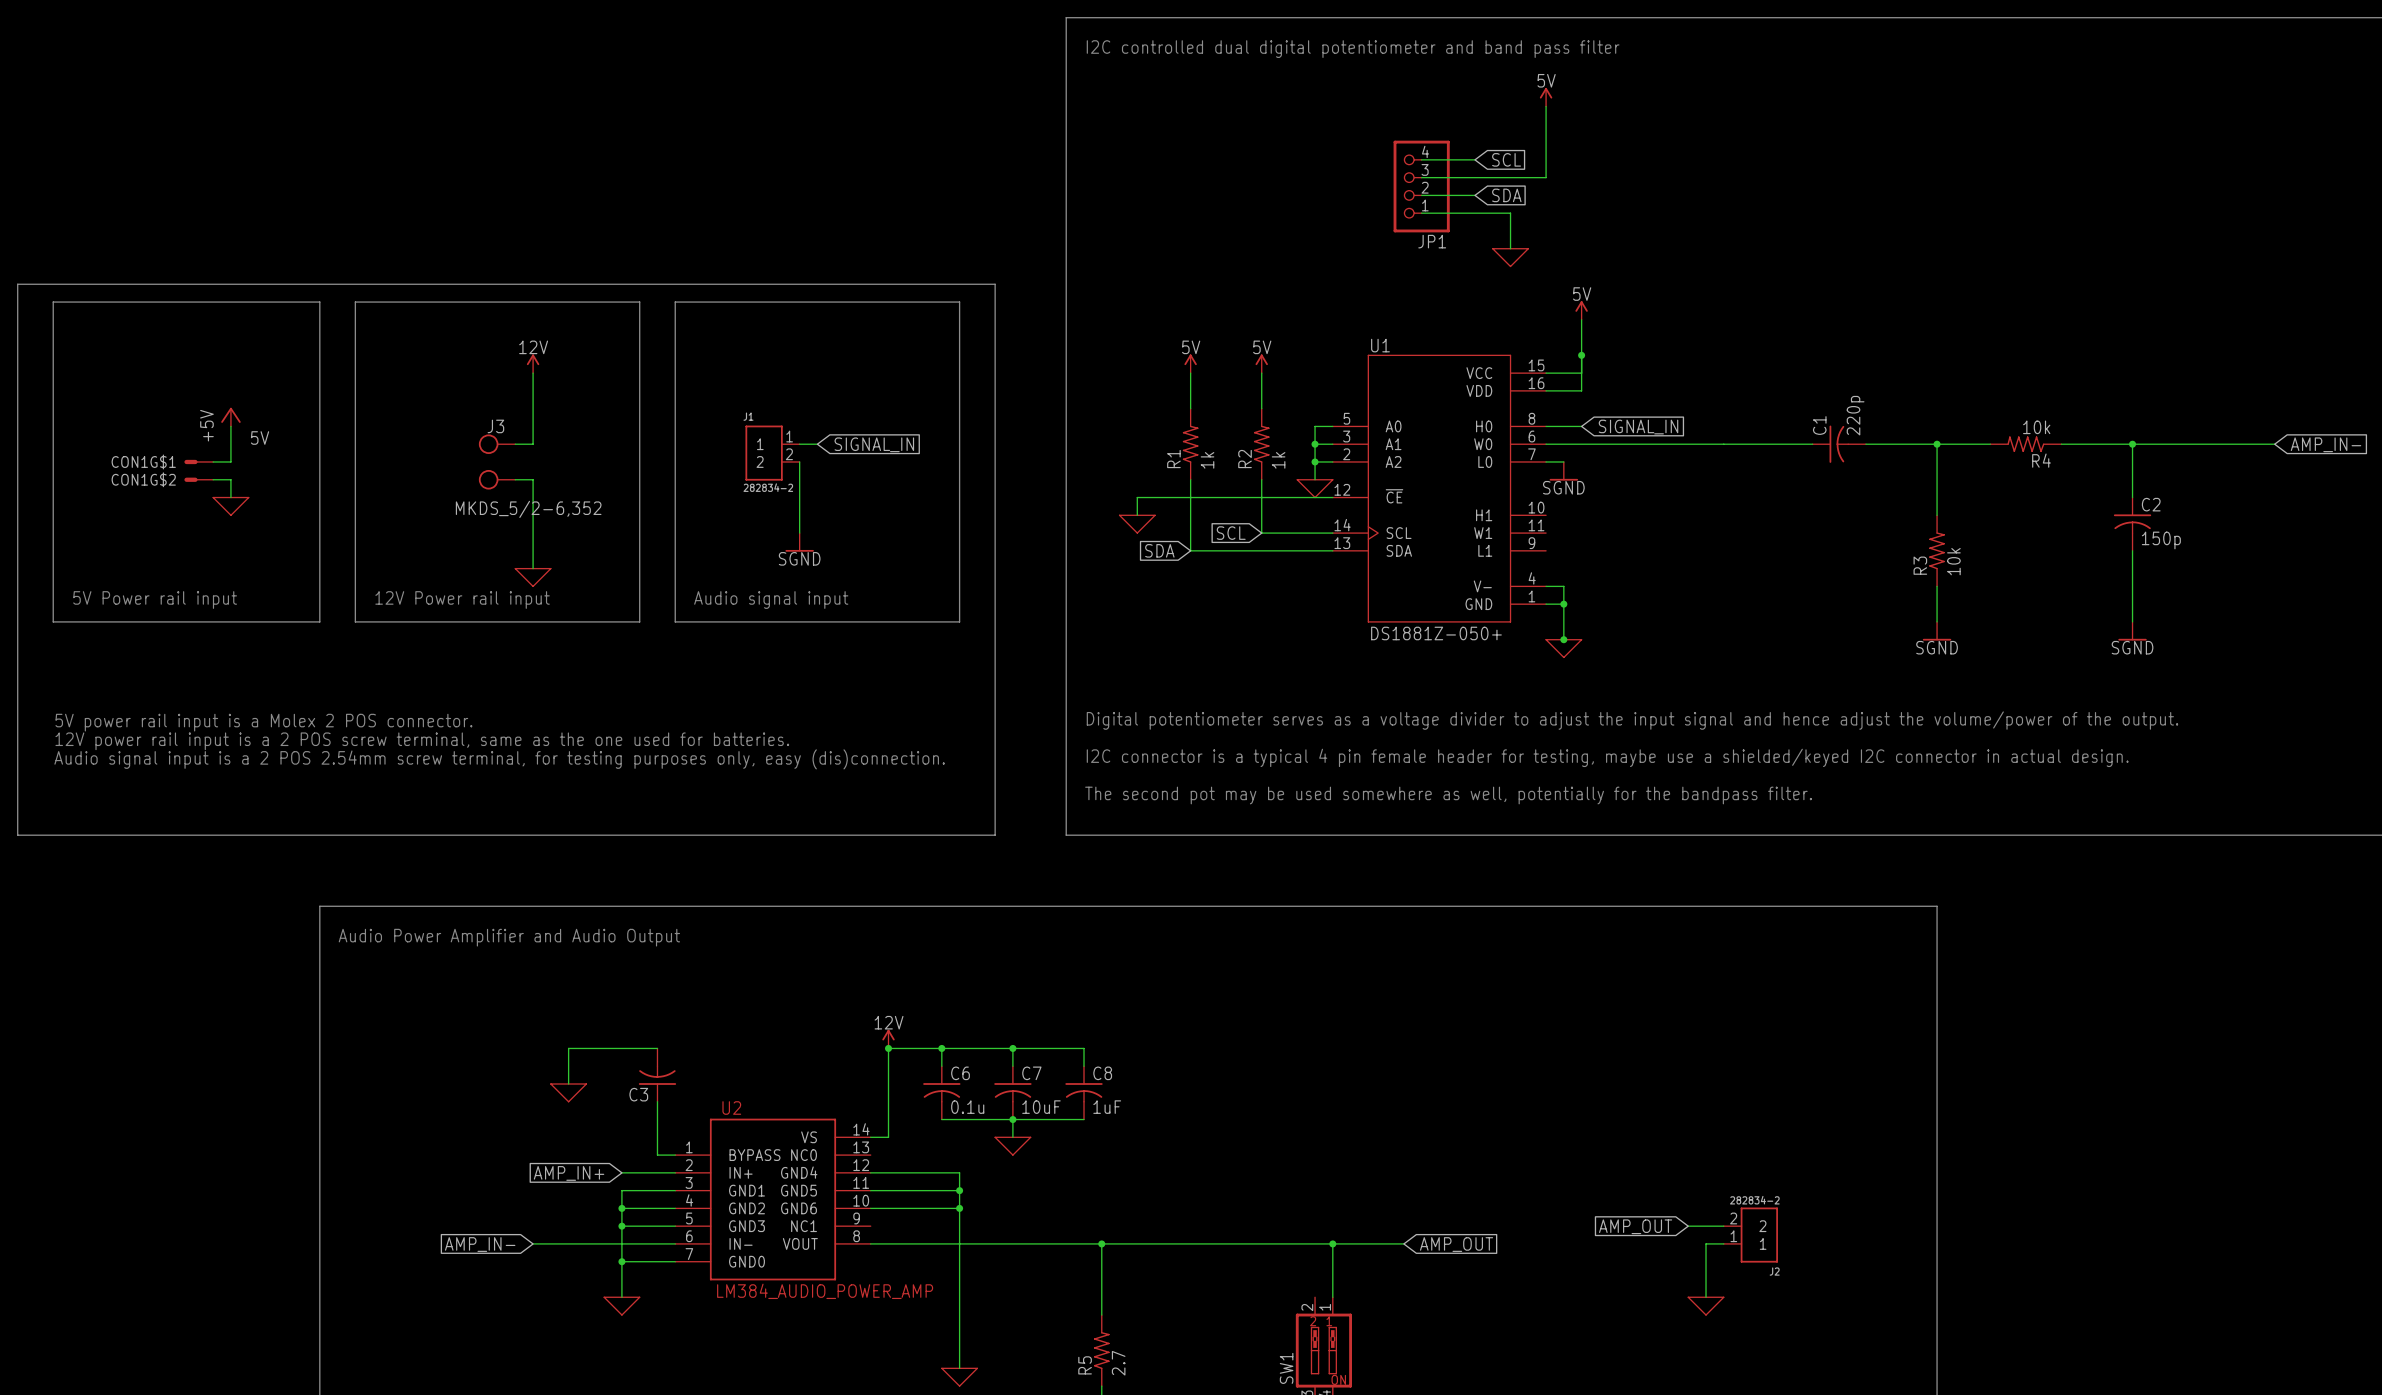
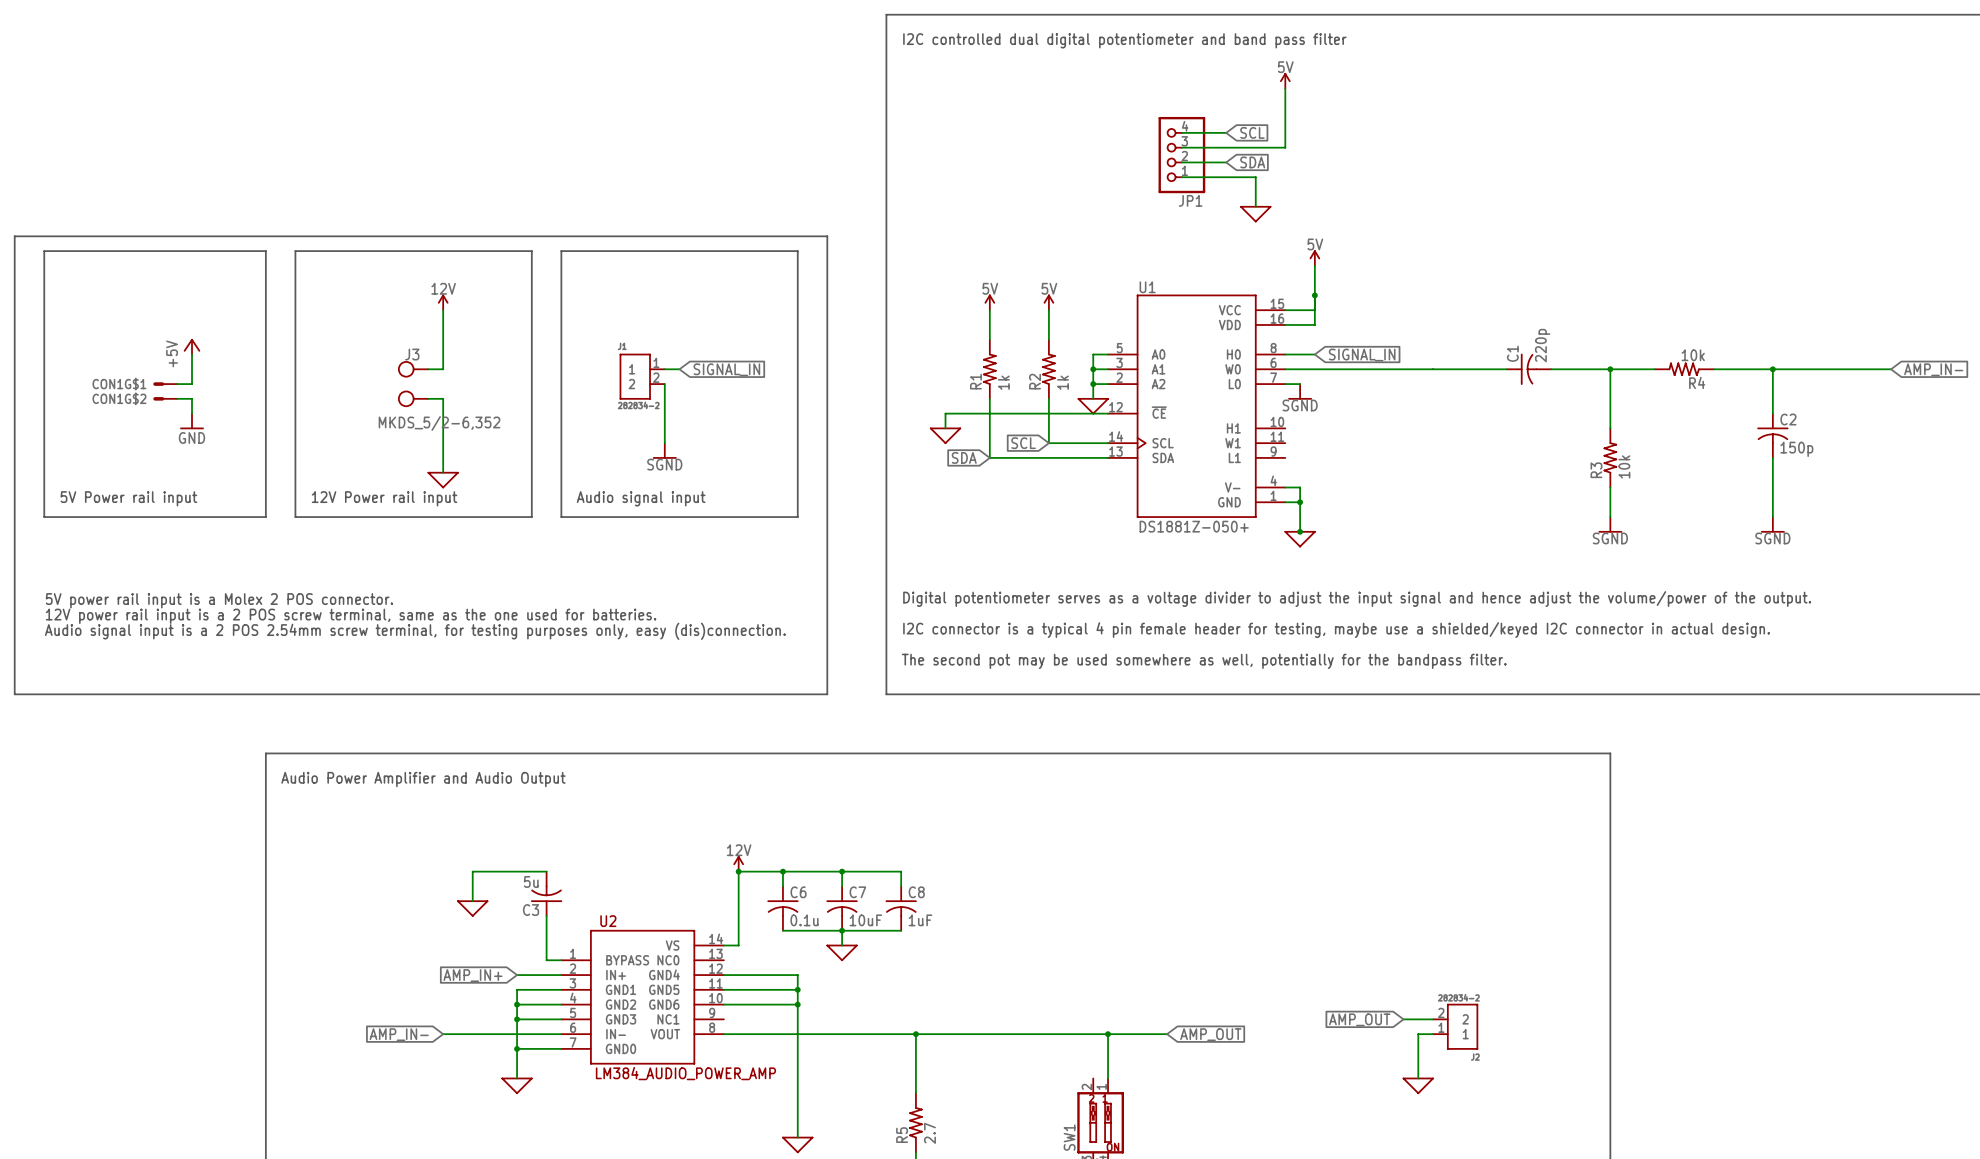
label: 5V (260, 437) -> none
power symbol shape: [212, 497, 250, 516] -> [180, 413, 204, 430]
power symbol text: none -> GND (191, 438)
C3 value: none -> 5u (531, 881)

